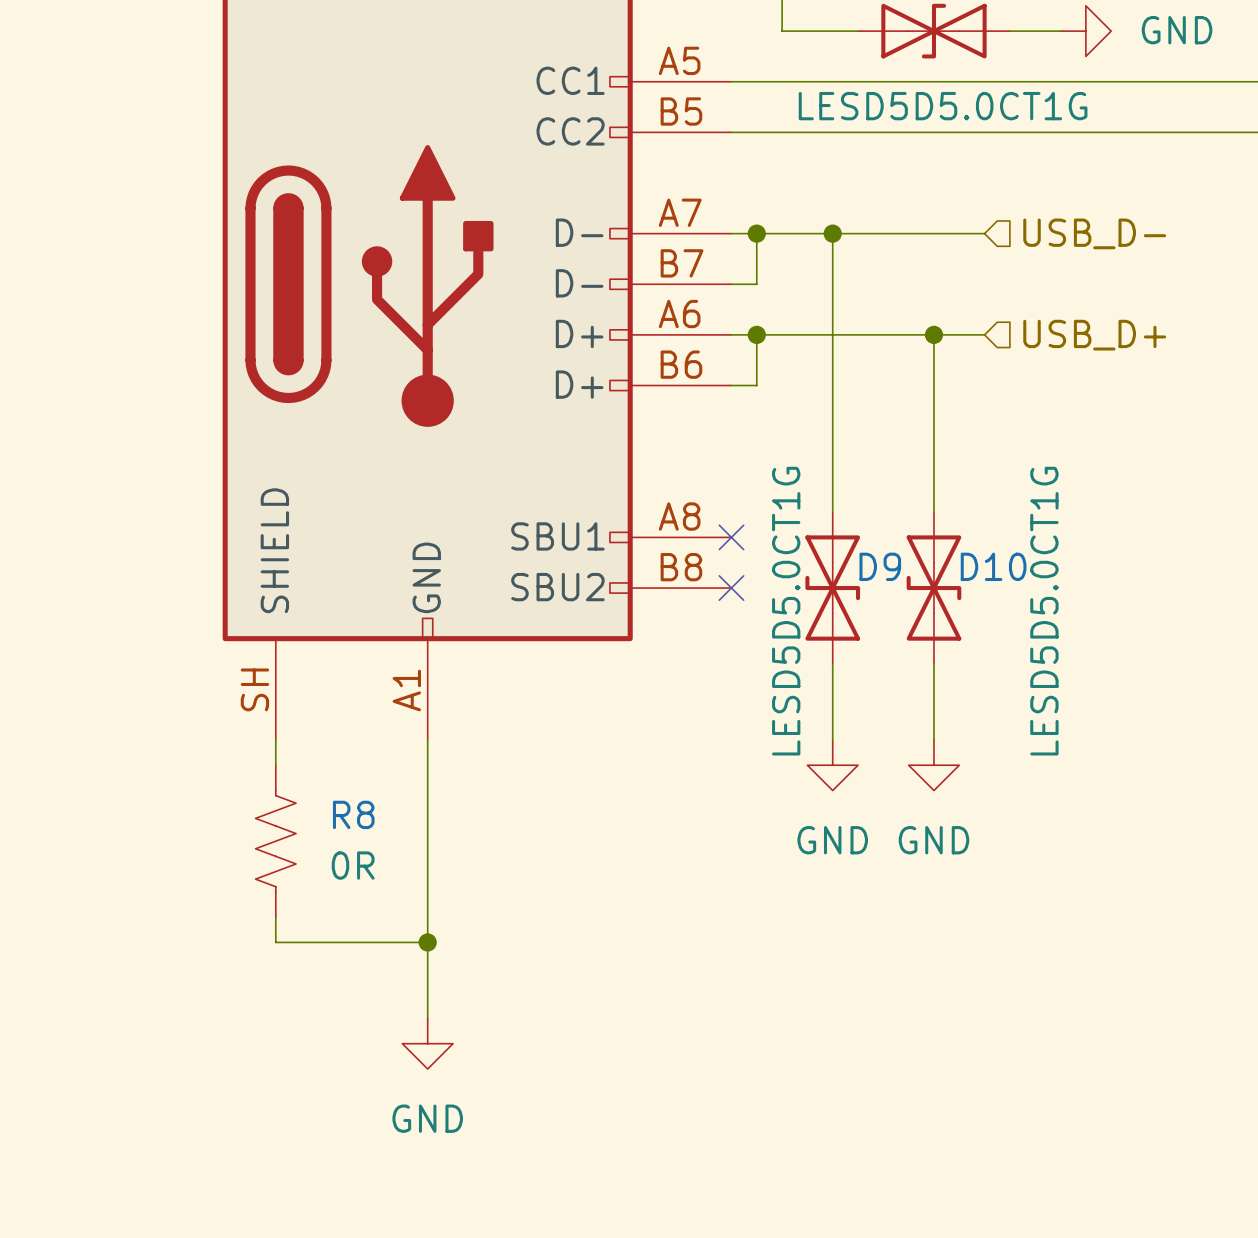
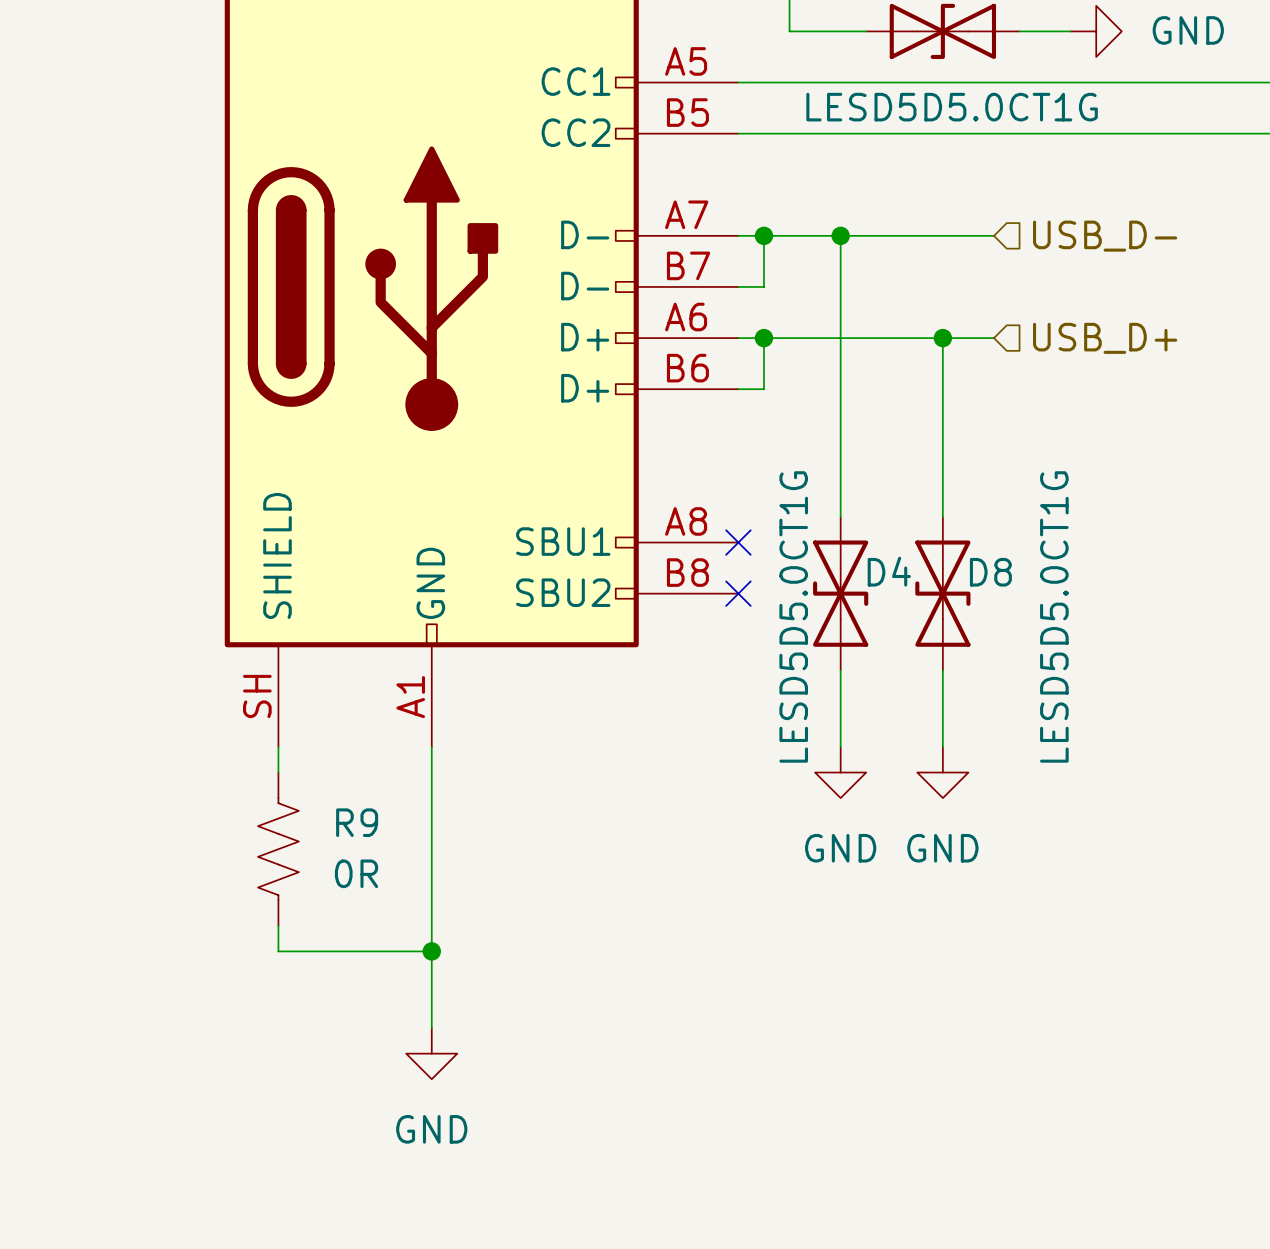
D9 name: D9 (880, 566) -> D4 (889, 571)
D10 name: D10 (993, 566) -> D8 (990, 572)
R8 name: R8 (353, 814) -> R9 (357, 822)

